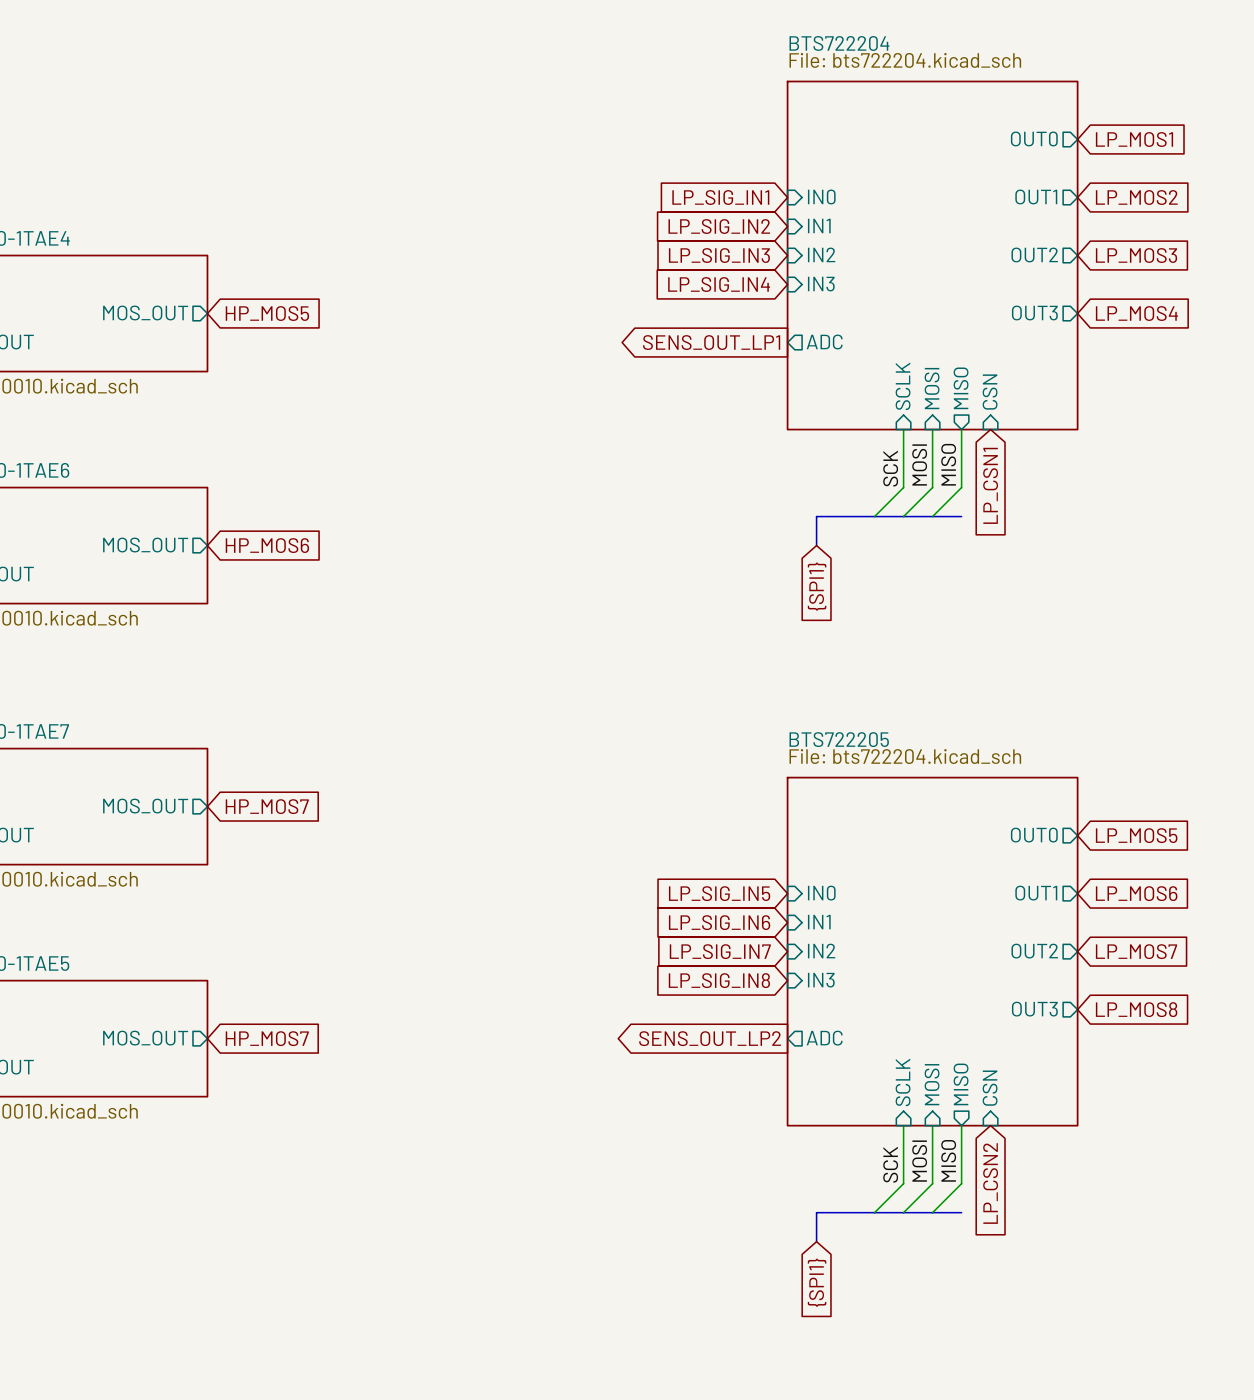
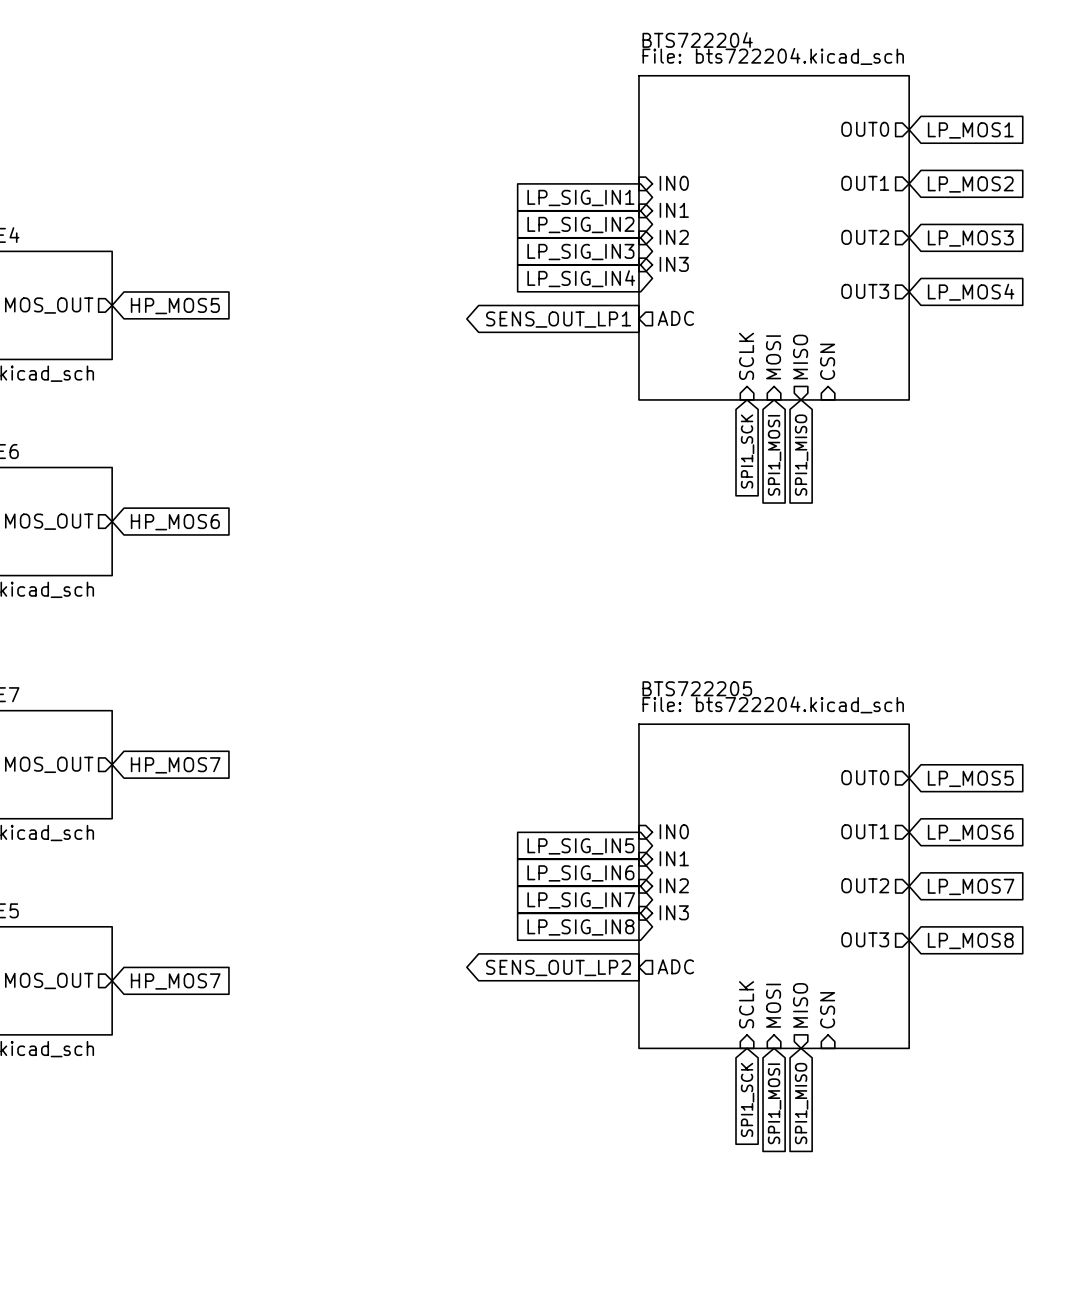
sheet pin position: OUT0 (1034, 138) -> OUT0 (865, 129)
global label position: LP_MOS1 (1134, 139) -> LP_MOS1 (970, 130)
sheet pin position: IN0 (821, 196) -> IN0 (674, 183)
sheet pin position: OUT1 (1036, 196) -> OUT1 (865, 183)
global label position: LP_MOS2 (1136, 197) -> LP_MOS2 (970, 184)
sheet pin position: IN1 (819, 225) -> IN1 (674, 210)
sheet pin position: IN2 (821, 254) -> IN2 (674, 237)
sheet pin position: OUT2 (1034, 254) -> OUT2 (865, 237)
sheet BTS722204 position: (932, 255) -> (774, 237)
global label position: LP_MOS3 (1136, 255) -> LP_MOS3 (970, 238)
sheet pin position: IN3 (821, 284) -> IN3 (674, 264)
sheet pin position: OUT3 (1034, 312) -> OUT3 (865, 291)
global label position: LP_MOS4 (1136, 313) -> LP_MOS4 (971, 292)
global label position: SENS_OUT_LP1 (711, 342) -> SENS_OUT_LP1 (558, 319)
sheet pin position: ADC (824, 342) -> ADC (675, 318)
sheet pin position: SCLK (903, 386) -> SCLK (746, 356)
sheet pin position: MOSI (932, 388) -> MOSI (773, 357)
sheet pin position: MISO (961, 388) -> MISO (800, 356)
sheet pin position: CSN (990, 392) -> CSN (827, 361)
wire: (903, 429) (903, 487) (874, 516) -> none
wire: (932, 429) (932, 487) (903, 516) -> none
wire: (961, 429) (961, 487) (932, 516) -> none
global label: none -> SPI1_SCK (747, 451)
label: MOSI (919, 464) -> none
label: MISO (948, 464) -> none
global label: none -> SPI1_MOSI (774, 455)
global label: none -> SPI1_MISO (801, 455)
label: SCK (890, 468) -> none
global label: LP_CSN1 (990, 485) -> none
bus: (961, 516) (816, 516) (816, 545) -> none
global label: {SPI1} (817, 586) -> none
sheet pin position: OUT0 (1034, 835) -> OUT0 (865, 777)
global label position: LP_MOS5 (1136, 835) -> LP_MOS5 (970, 778)
sheet pin position: IN0 (821, 893) -> IN0 (674, 831)
sheet pin position: OUT1 (1036, 893) -> OUT1 (865, 831)
global label position: LP_MOS6 (1136, 893) -> LP_MOS6 (970, 832)
sheet pin position: IN1 (819, 922) -> IN1 (674, 858)
sheet pin position: IN2 (821, 951) -> IN2 (674, 885)
sheet BTS722205 position: (932, 951) -> (774, 886)
sheet pin position: OUT2 (1034, 951) -> OUT2 (865, 885)
global label position: LP_MOS7 (1136, 951) -> LP_MOS7 (971, 886)
sheet pin position: IN3 (821, 980) -> IN3 (674, 912)
sheet pin position: OUT3 (1034, 1009) -> OUT3 (865, 939)
global label position: LP_MOS8 (1136, 1009) -> LP_MOS8 (970, 940)
global label position: SENS_OUT_LP2 (710, 1038) -> SENS_OUT_LP2 (558, 967)
sheet pin position: ADC (824, 1038) -> ADC (675, 966)
sheet pin position: SCLK (903, 1082) -> SCLK (746, 1004)
sheet pin position: MOSI (932, 1084) -> MOSI (773, 1005)
sheet pin position: MISO (961, 1084) -> MISO (800, 1005)
sheet pin position: CSN (990, 1088) -> CSN (827, 1010)
wire: (903, 1125) (903, 1183) (874, 1212) -> none
wire: (932, 1125) (932, 1183) (903, 1212) -> none
wire: (961, 1125) (961, 1183) (932, 1212) -> none
global label: none -> SPI1_SCK (747, 1099)
label: MISO (948, 1160) -> none
global label: none -> SPI1_MOSI (774, 1103)
label: MOSI (919, 1161) -> none
global label: none -> SPI1_MISO (801, 1103)
label: SCK (890, 1164) -> none
global label: LP_CSN2 (990, 1183) -> none
bus: (961, 1212) (816, 1212) (816, 1241) -> none
global label: {SPI1} (817, 1282) -> none

